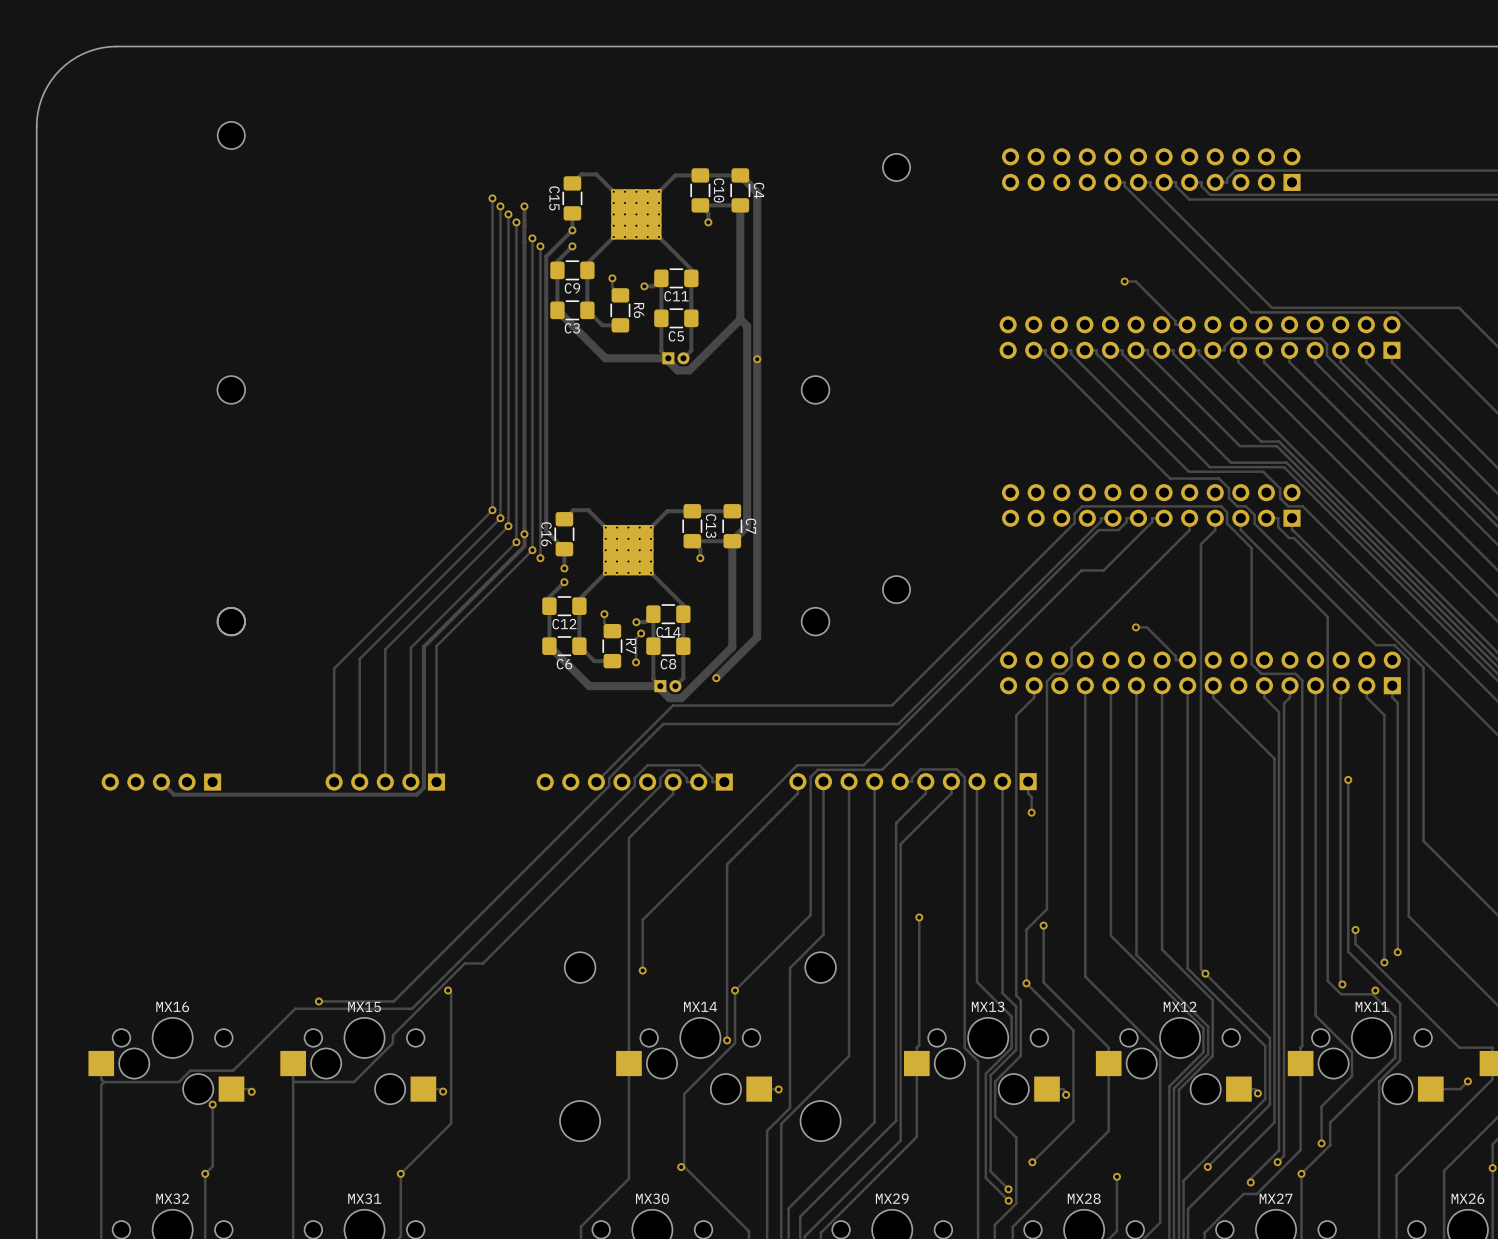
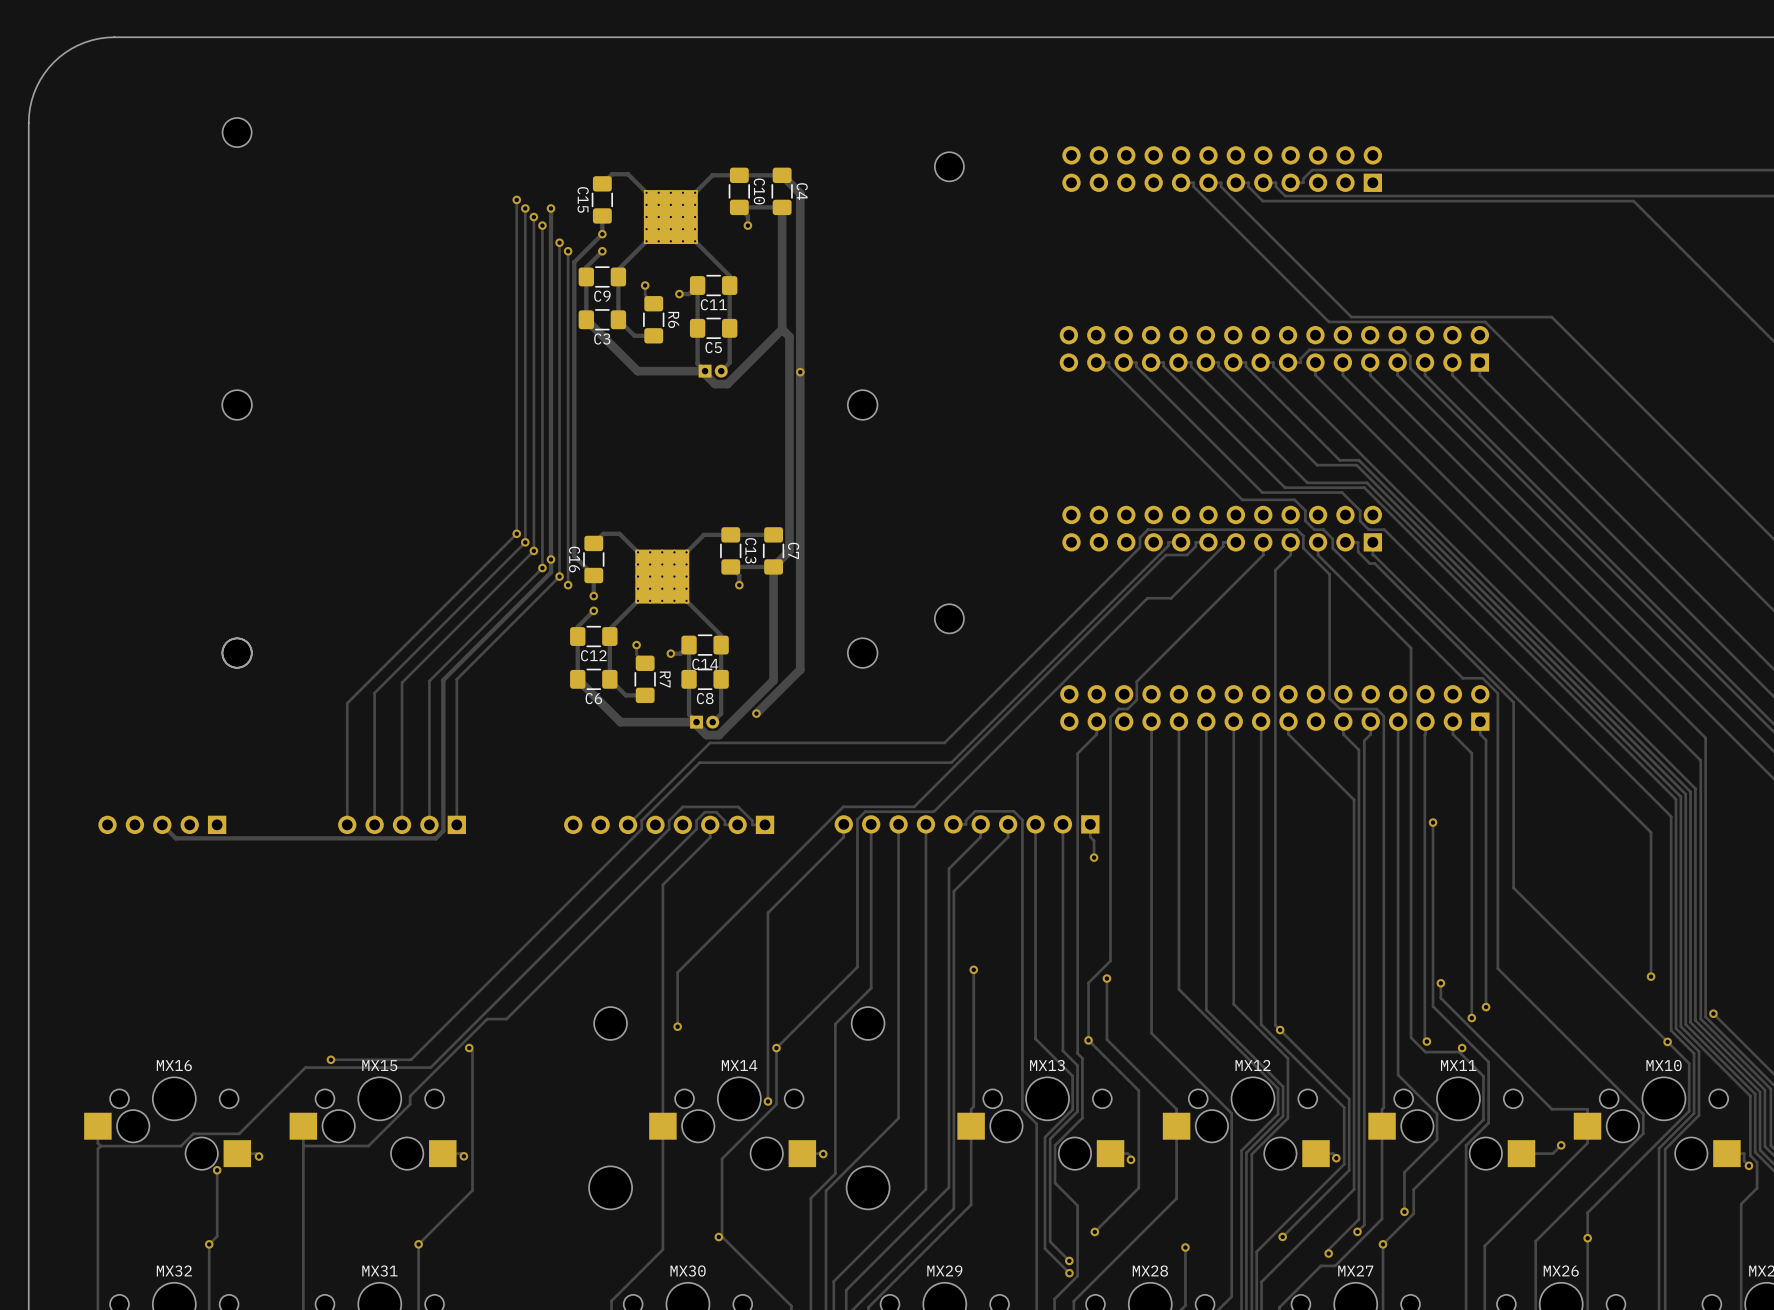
track: (1124, 281) (1135, 281) (1175, 321) (1175, 324) (1187, 324) -> none
via: (1124, 281) -> none
track: (1135, 627) (1146, 627) (1175, 656) (1175, 660) (1187, 660) -> none
via: (1135, 627) -> none
track: (641, 633) (636, 638) (636, 662) -> none
via: (641, 633) -> none
via: (636, 662) -> none

